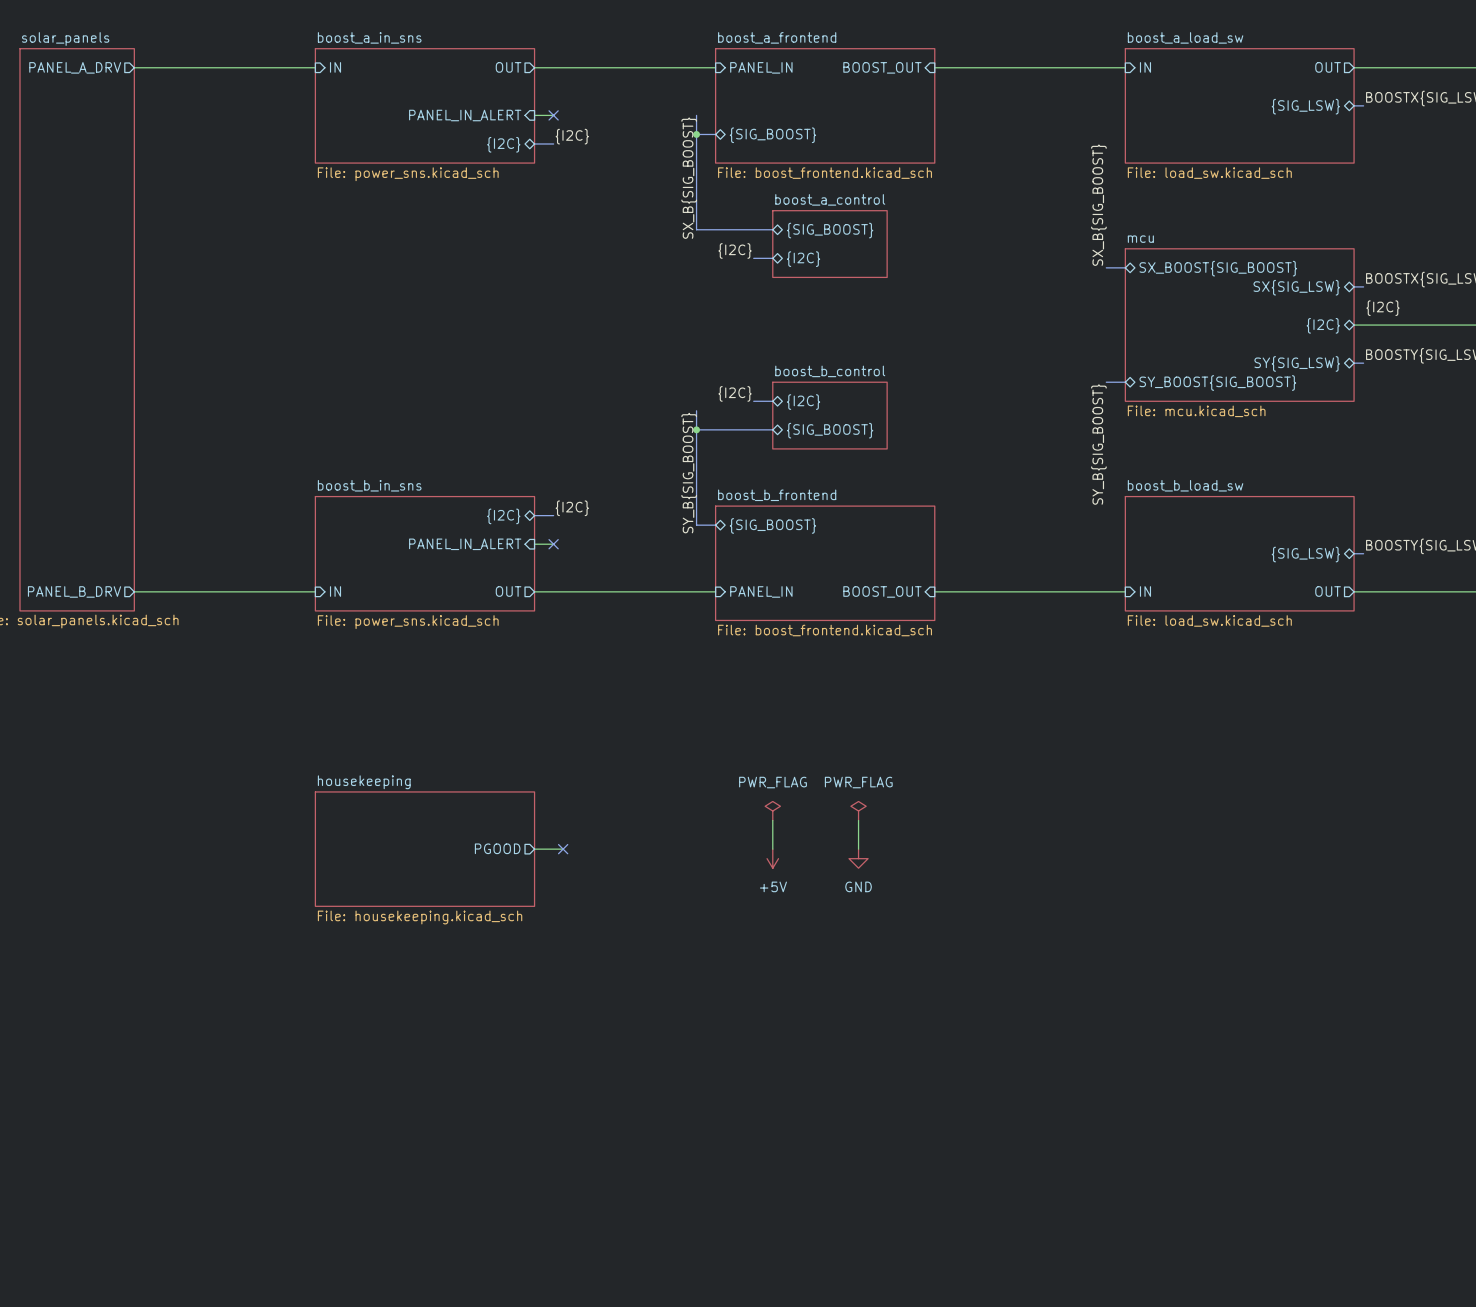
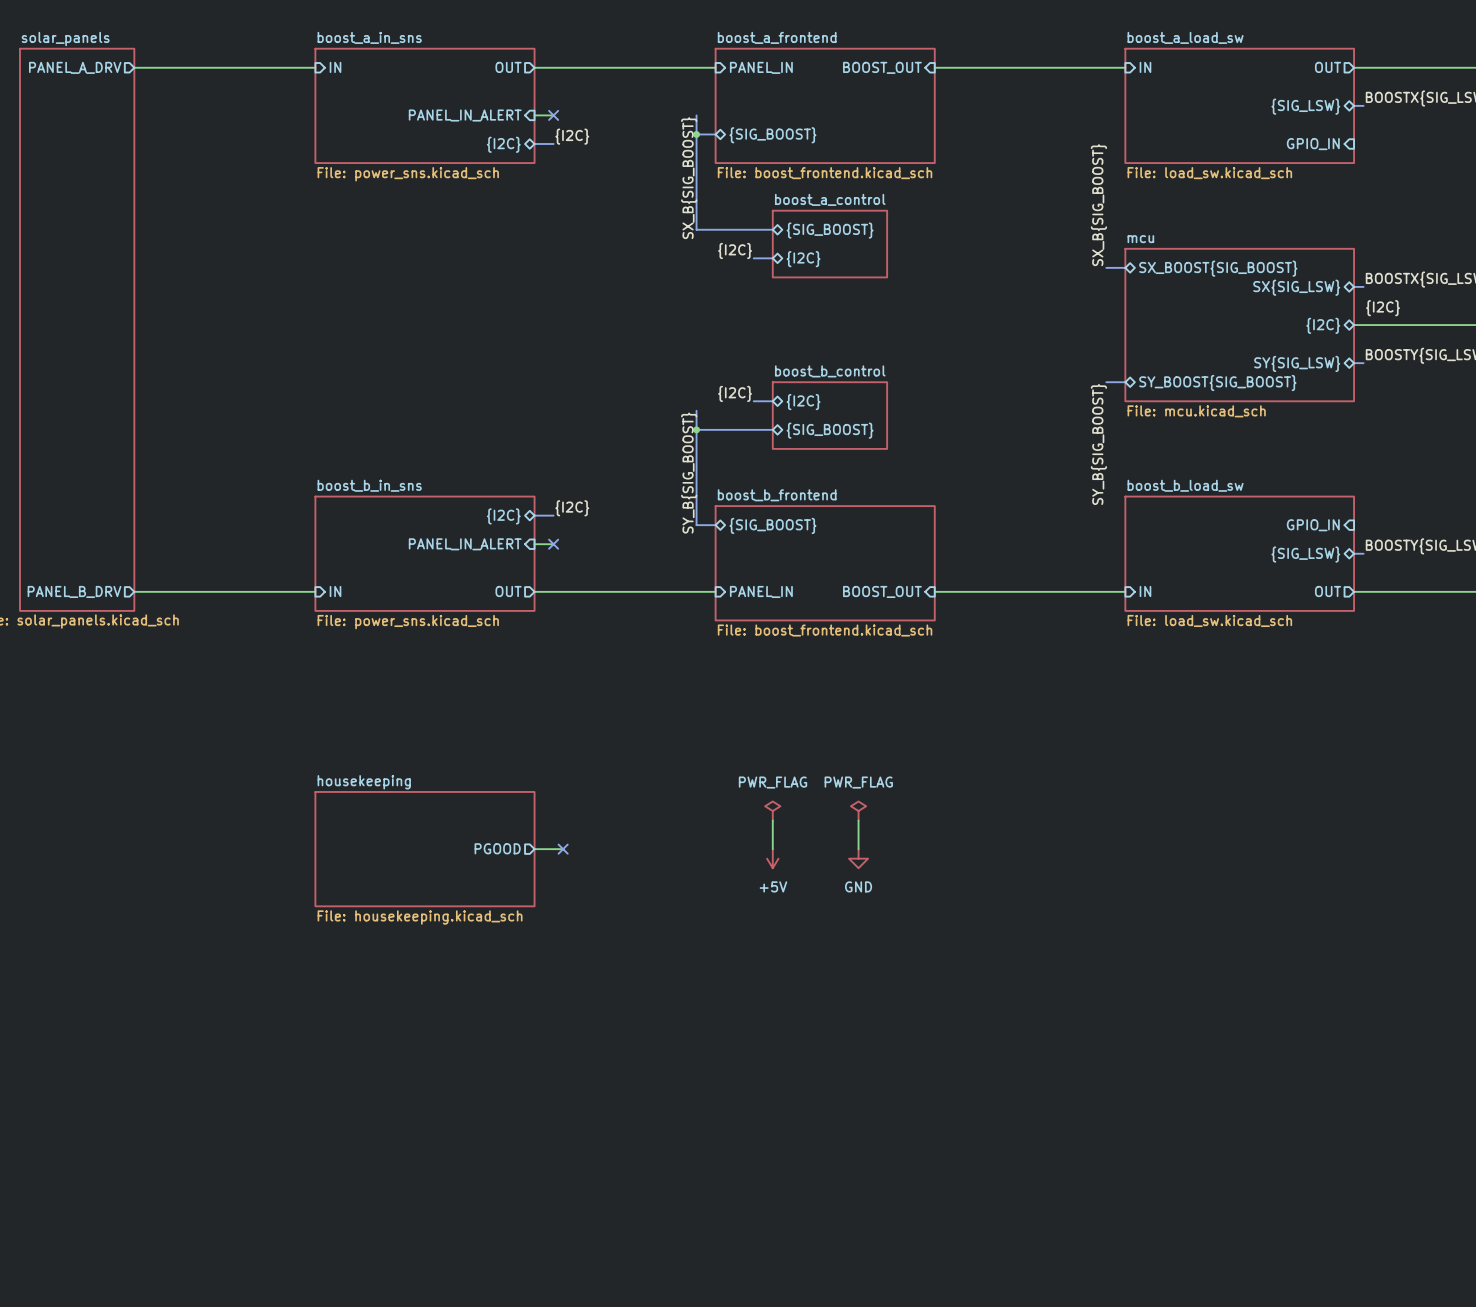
sheet pin: none -> GPIO_IN (1313, 144)
sheet pin: none -> GPIO_IN (1313, 525)

